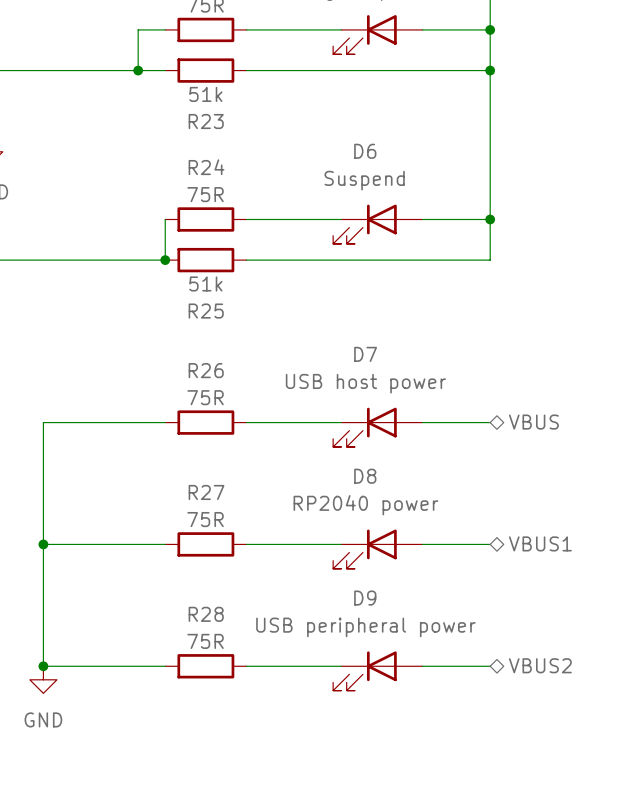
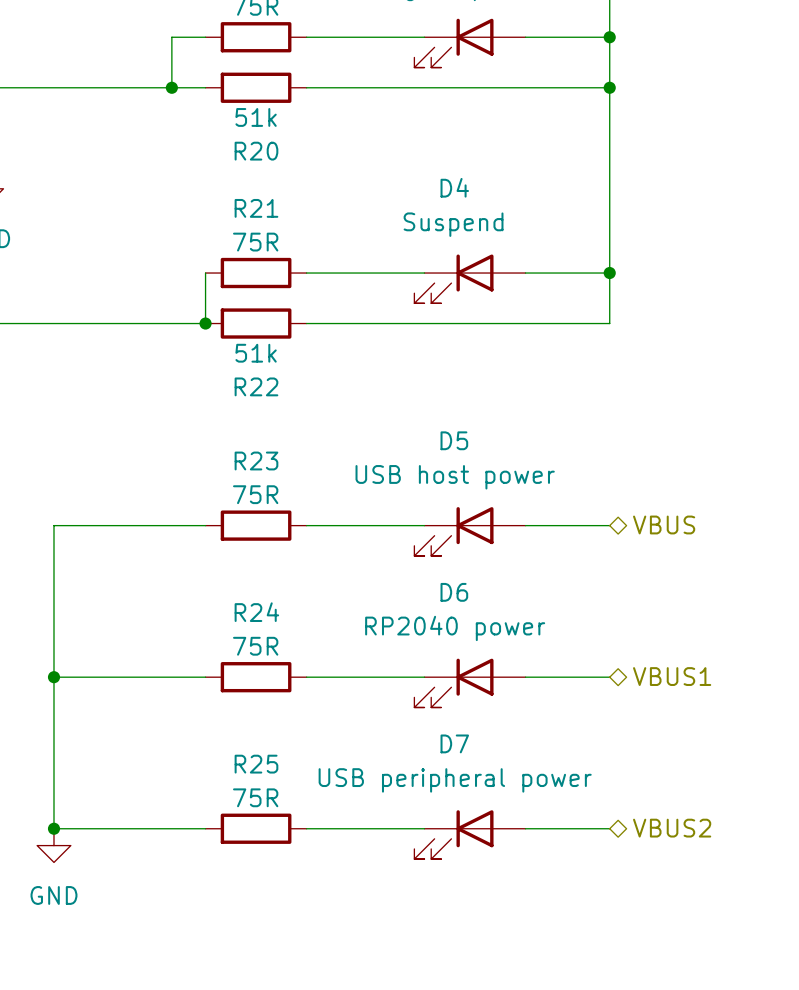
R23 name: R23 (206, 121) -> R20 (256, 151)
D6 name: D6 (365, 151) -> D4 (454, 187)
R24 name: R24 (206, 167) -> R21 (256, 208)
R25 name: R25 (206, 311) -> R22 (256, 386)
D7 name: D7 (365, 354) -> D5 (454, 440)
R26 name: R26 (206, 370) -> R23 (256, 461)
D8 name: D8 (365, 476) -> D6 (454, 592)
R27 name: R27 (206, 492) -> R24 (256, 612)
D9 name: D9 (365, 598) -> D7 (454, 743)
R28 name: R28 (206, 614) -> R25 (256, 764)

